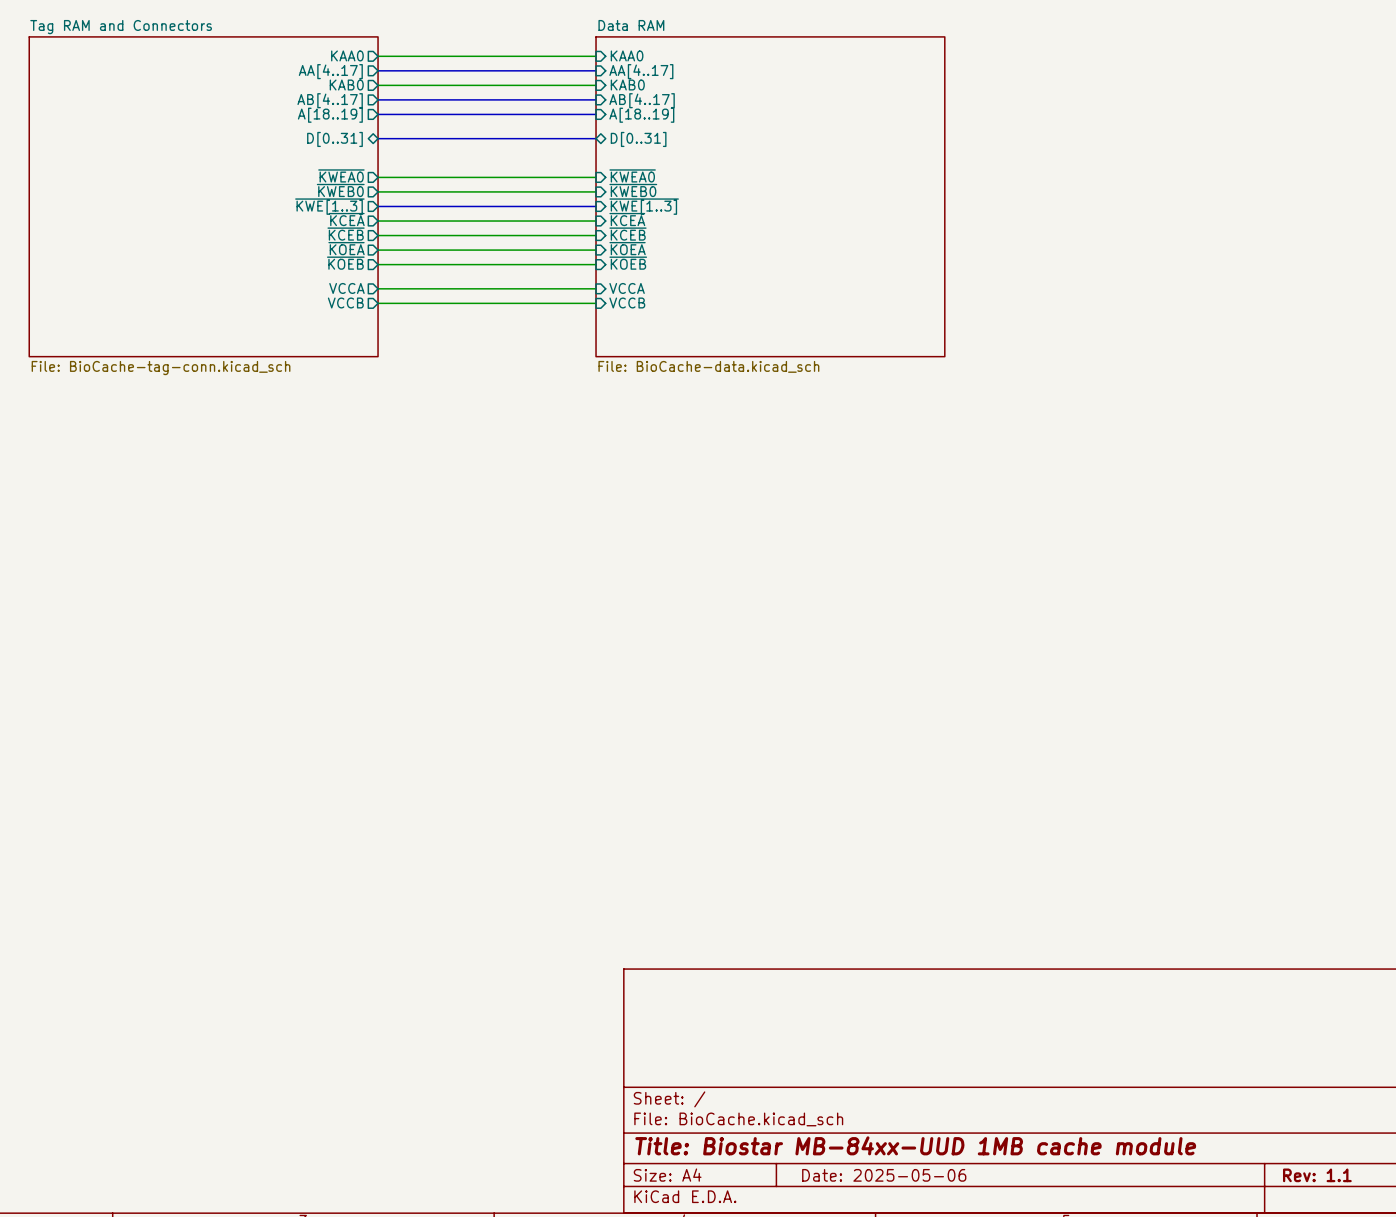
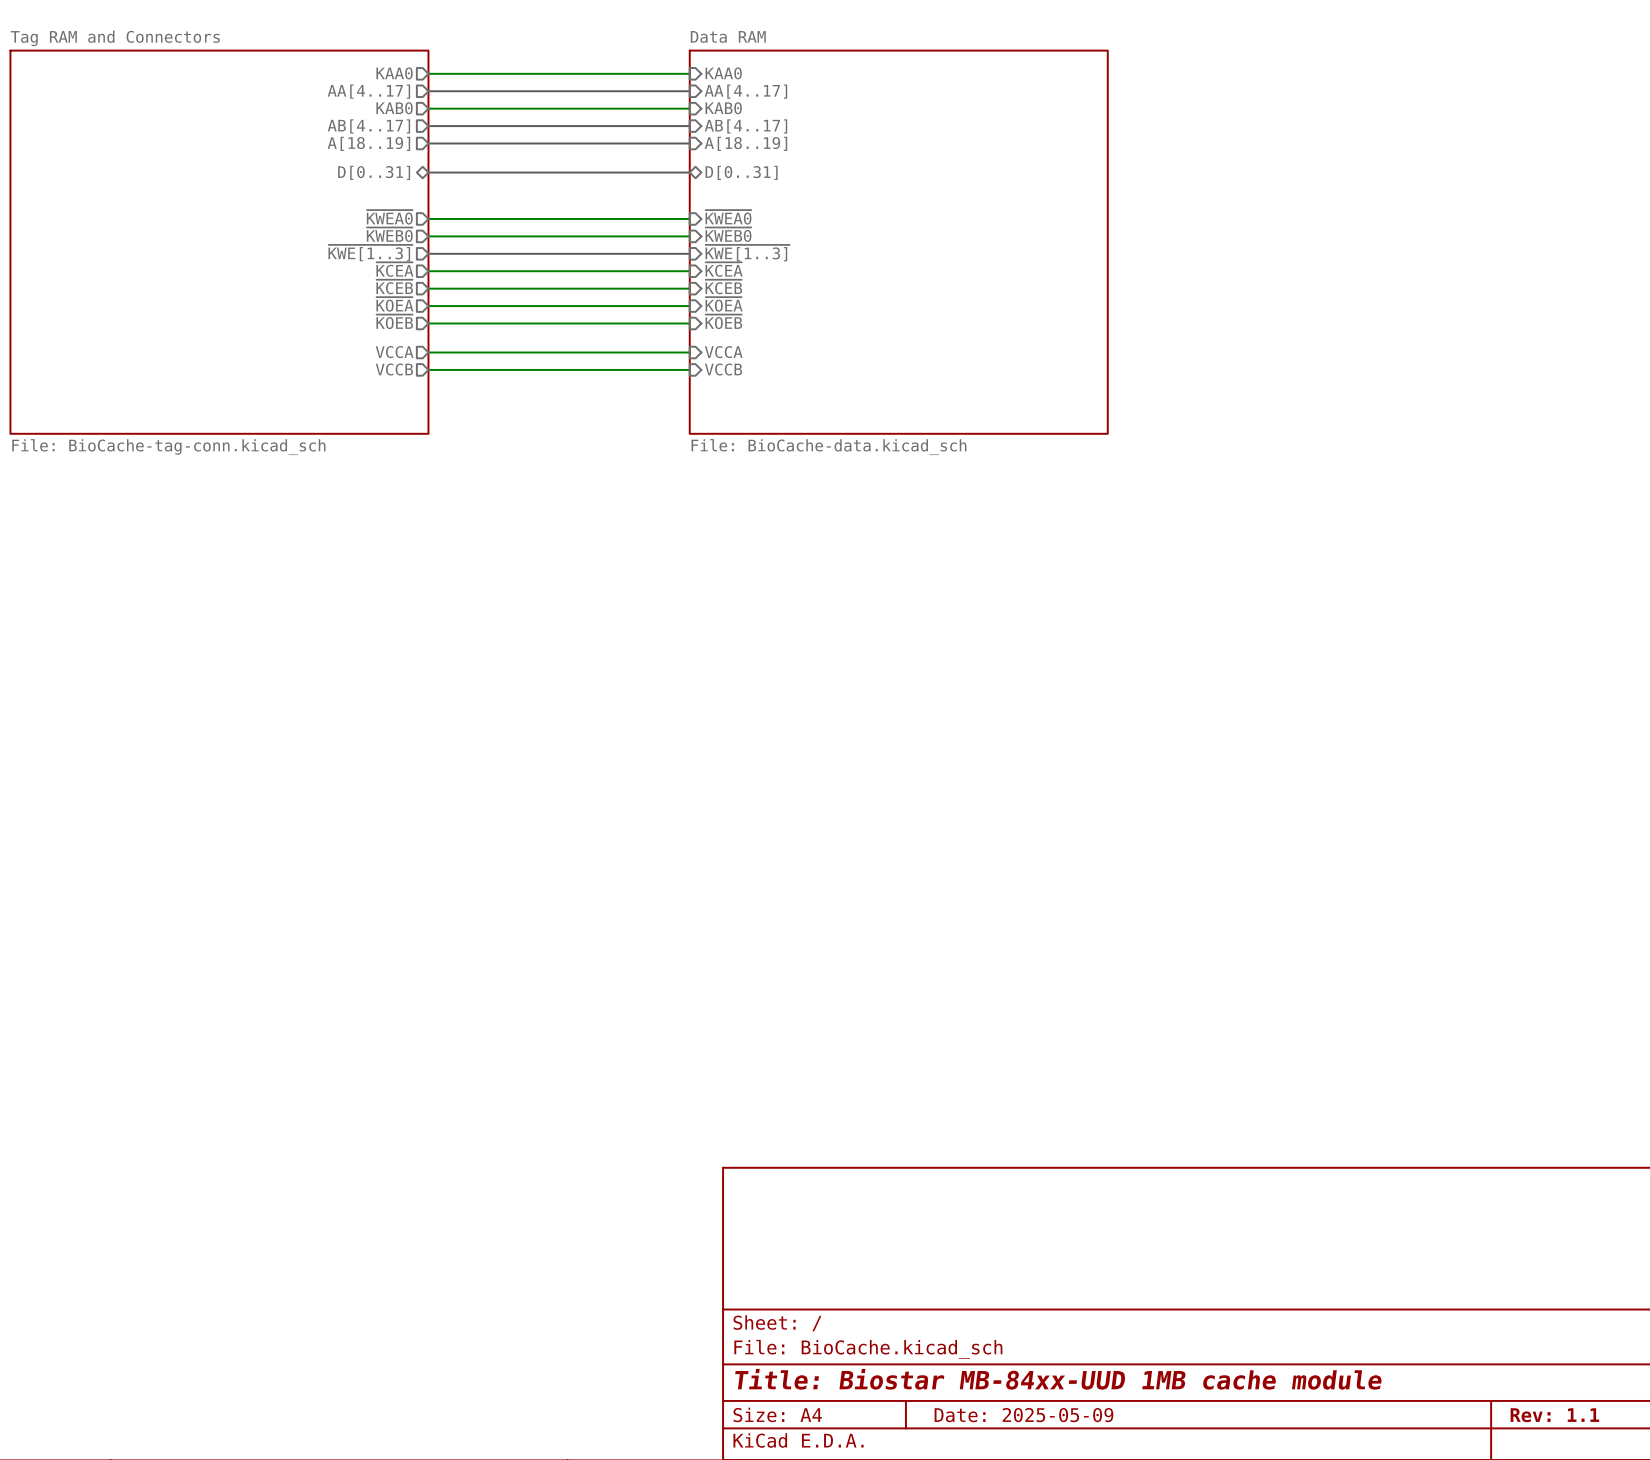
title block: Date: 2025-05-06 (884, 1175) -> Date: 2025-05-09 (1023, 1415)

